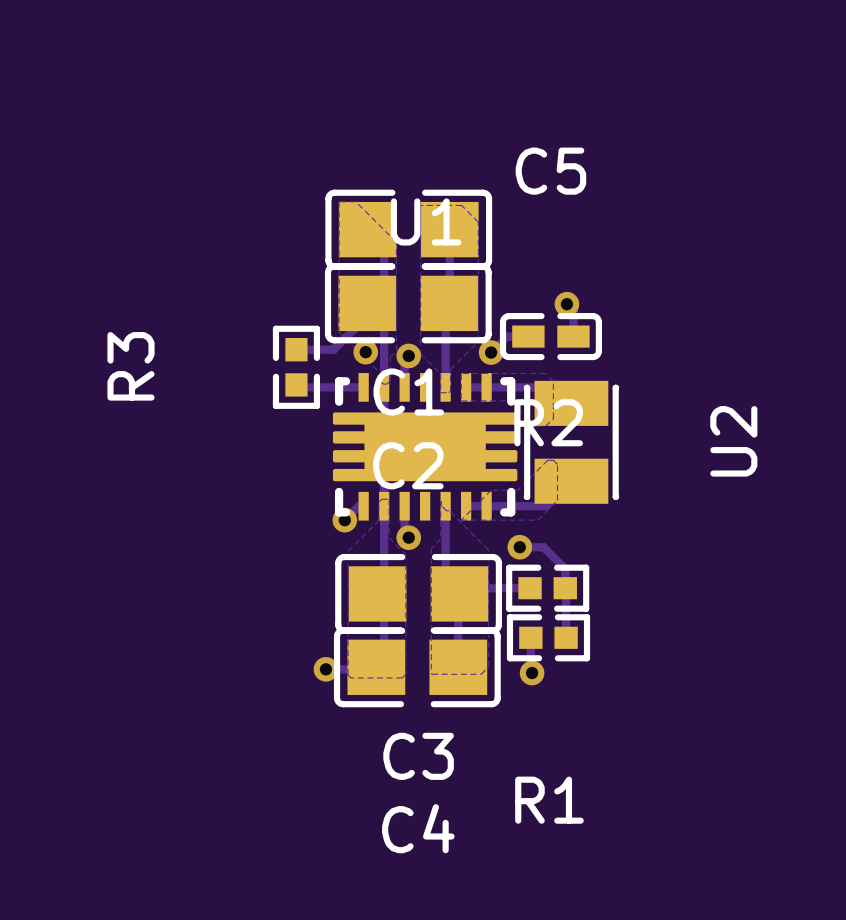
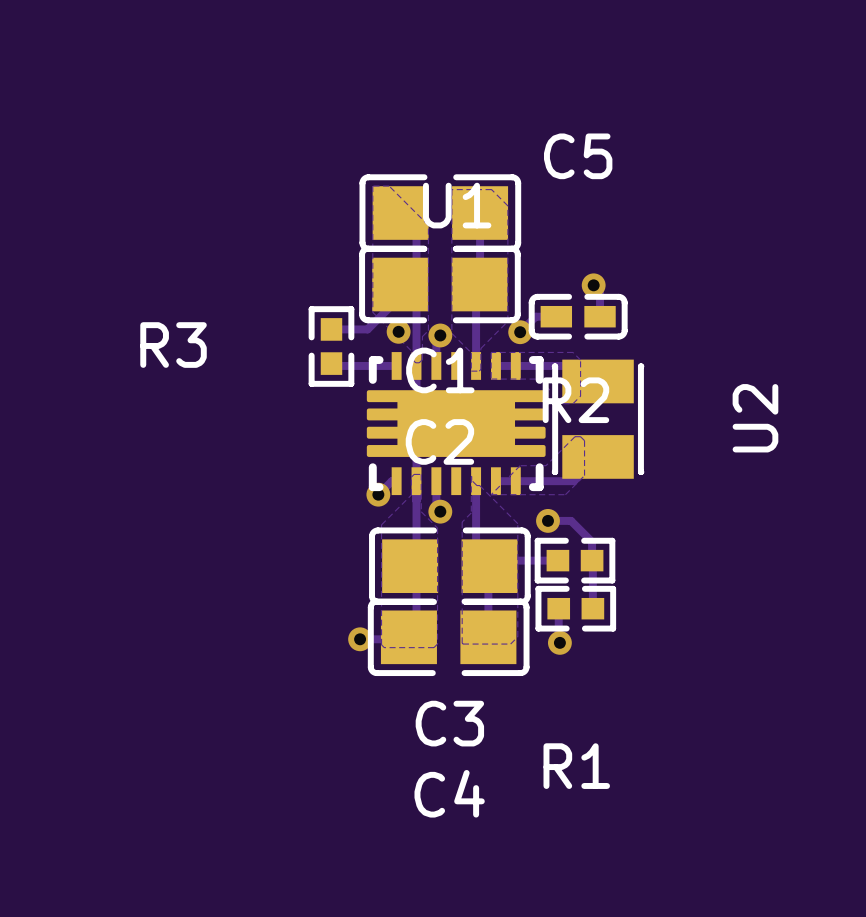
R3 name rotation: 0° (131, 366) -> 90° clockwise (173, 345)

